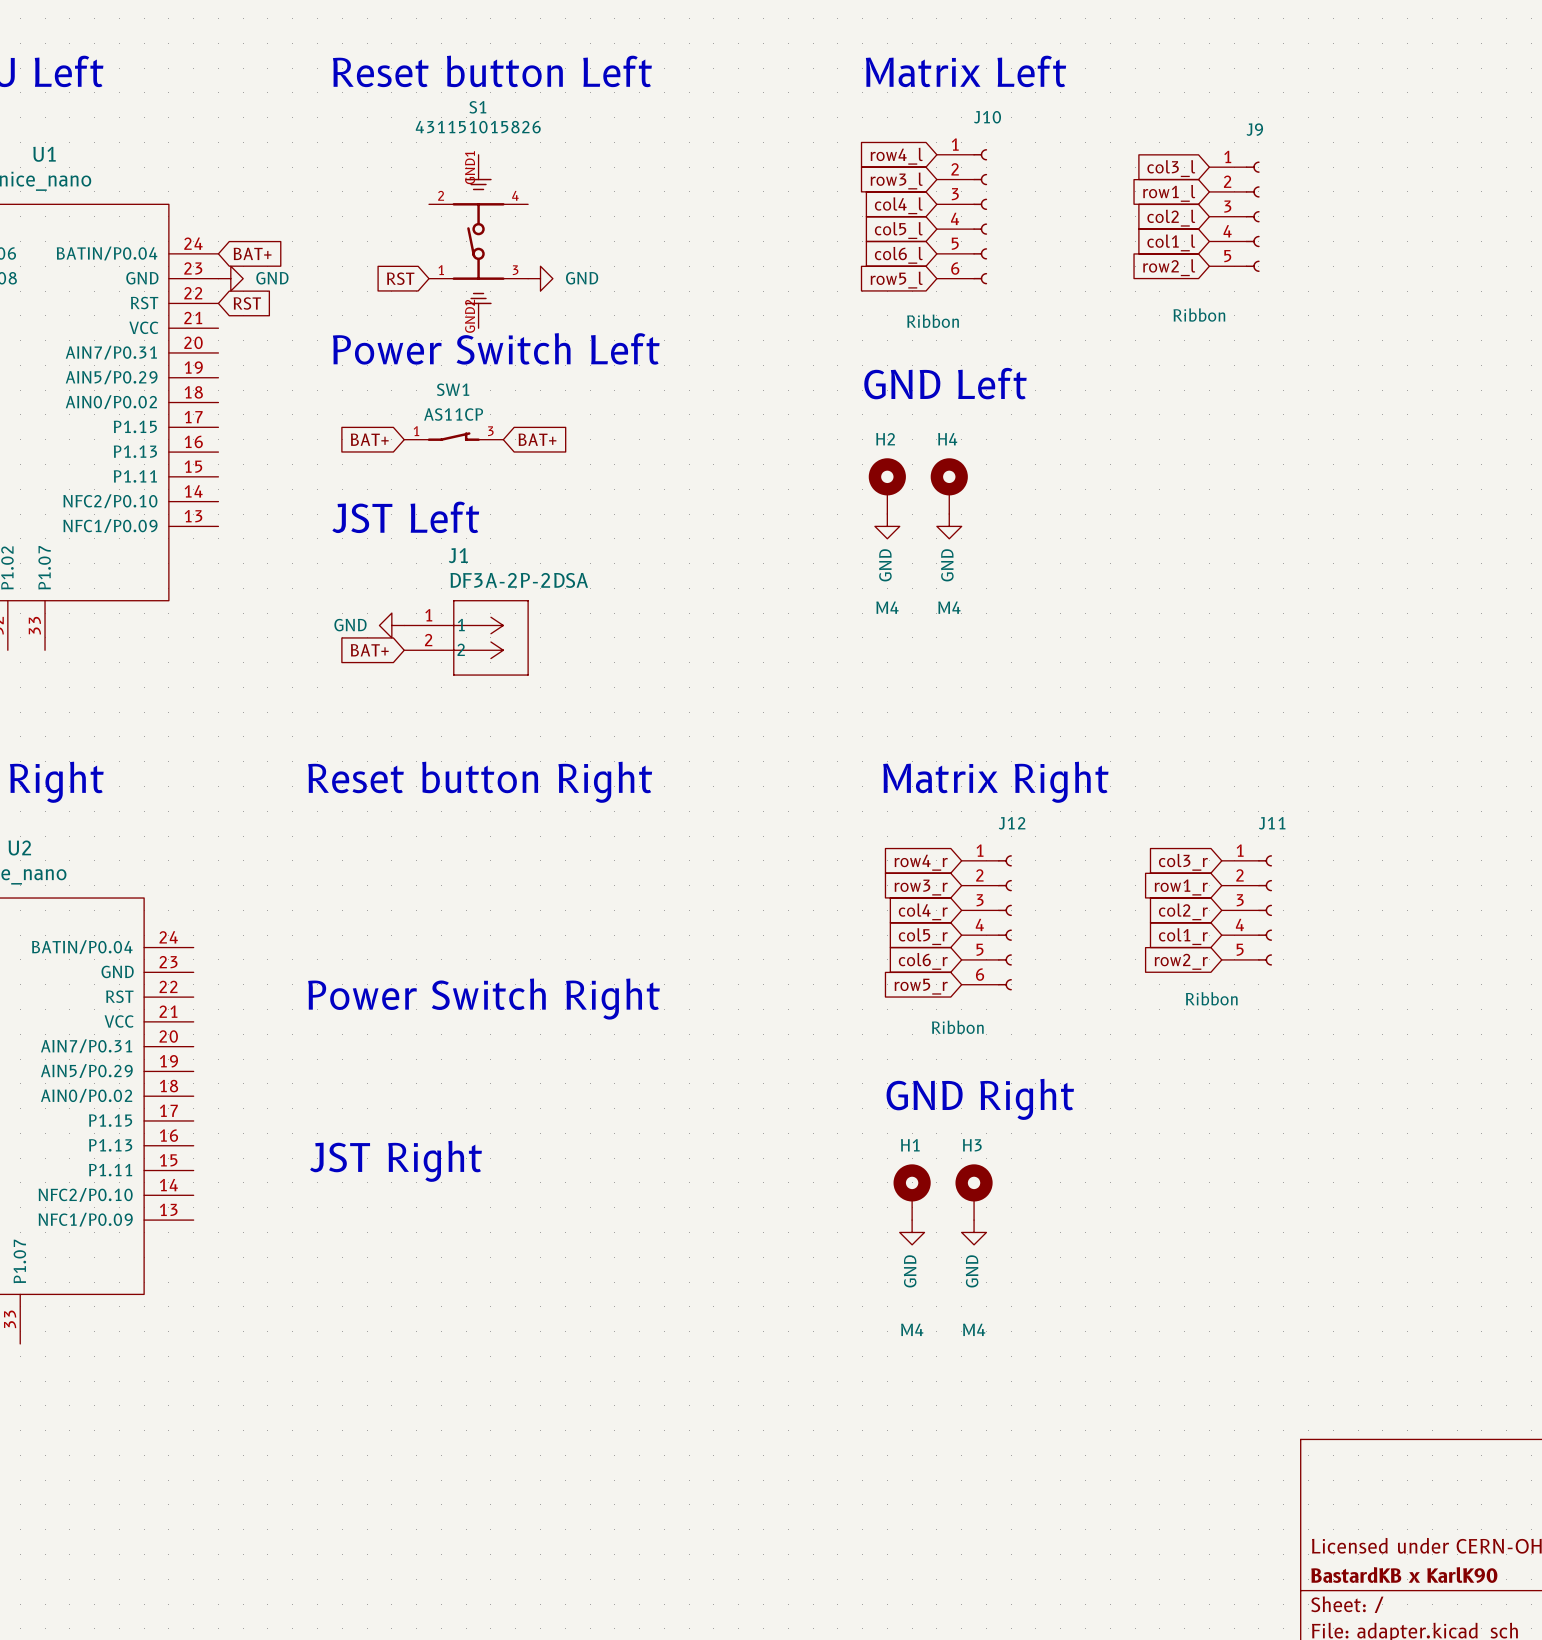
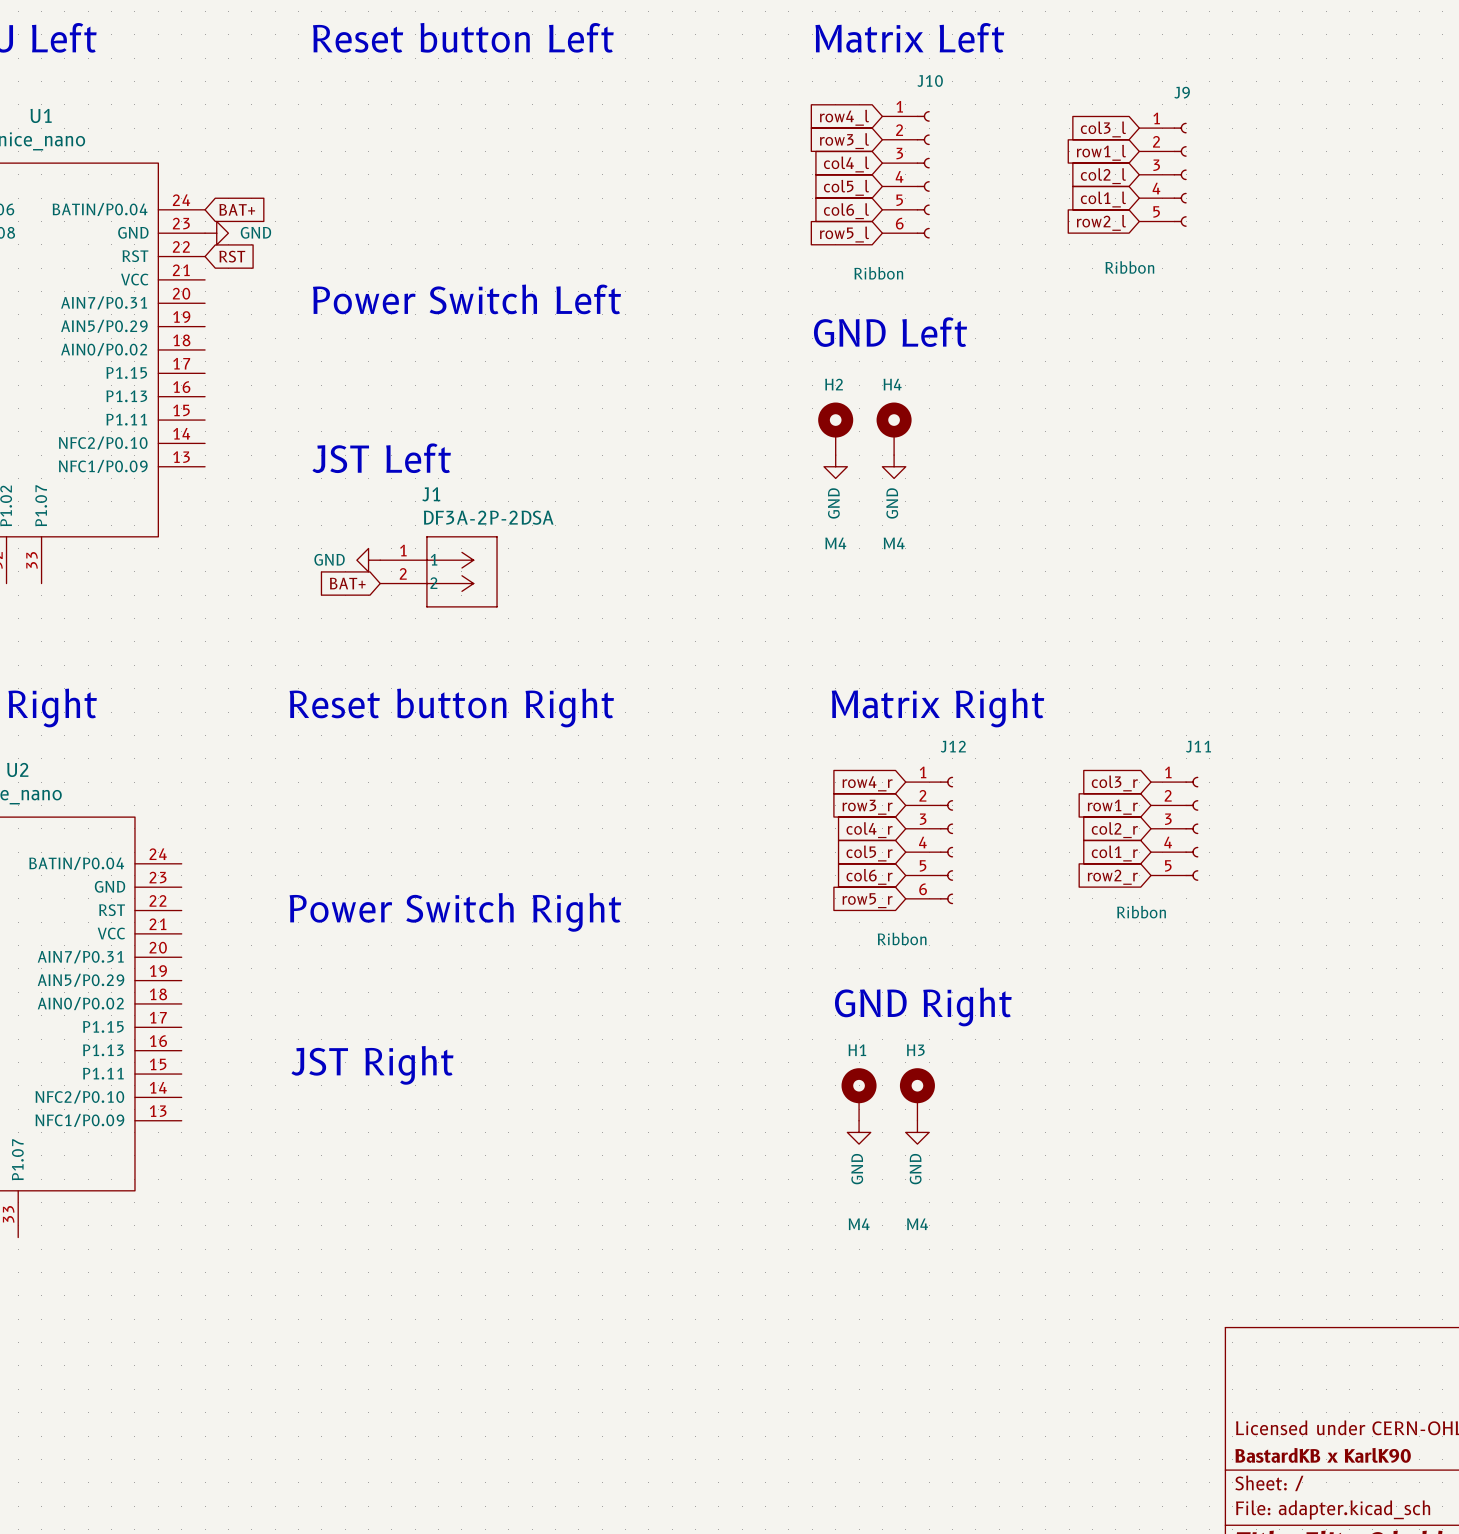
S1: 431151015826 (478, 241) -> none
global label: RST (400, 278) -> none
power symbol: GND (540, 278) -> none
SW1: AS11CP (453, 436) -> none
global label: BAT+ (369, 439) -> none
global label: BAT+ (537, 439) -> none

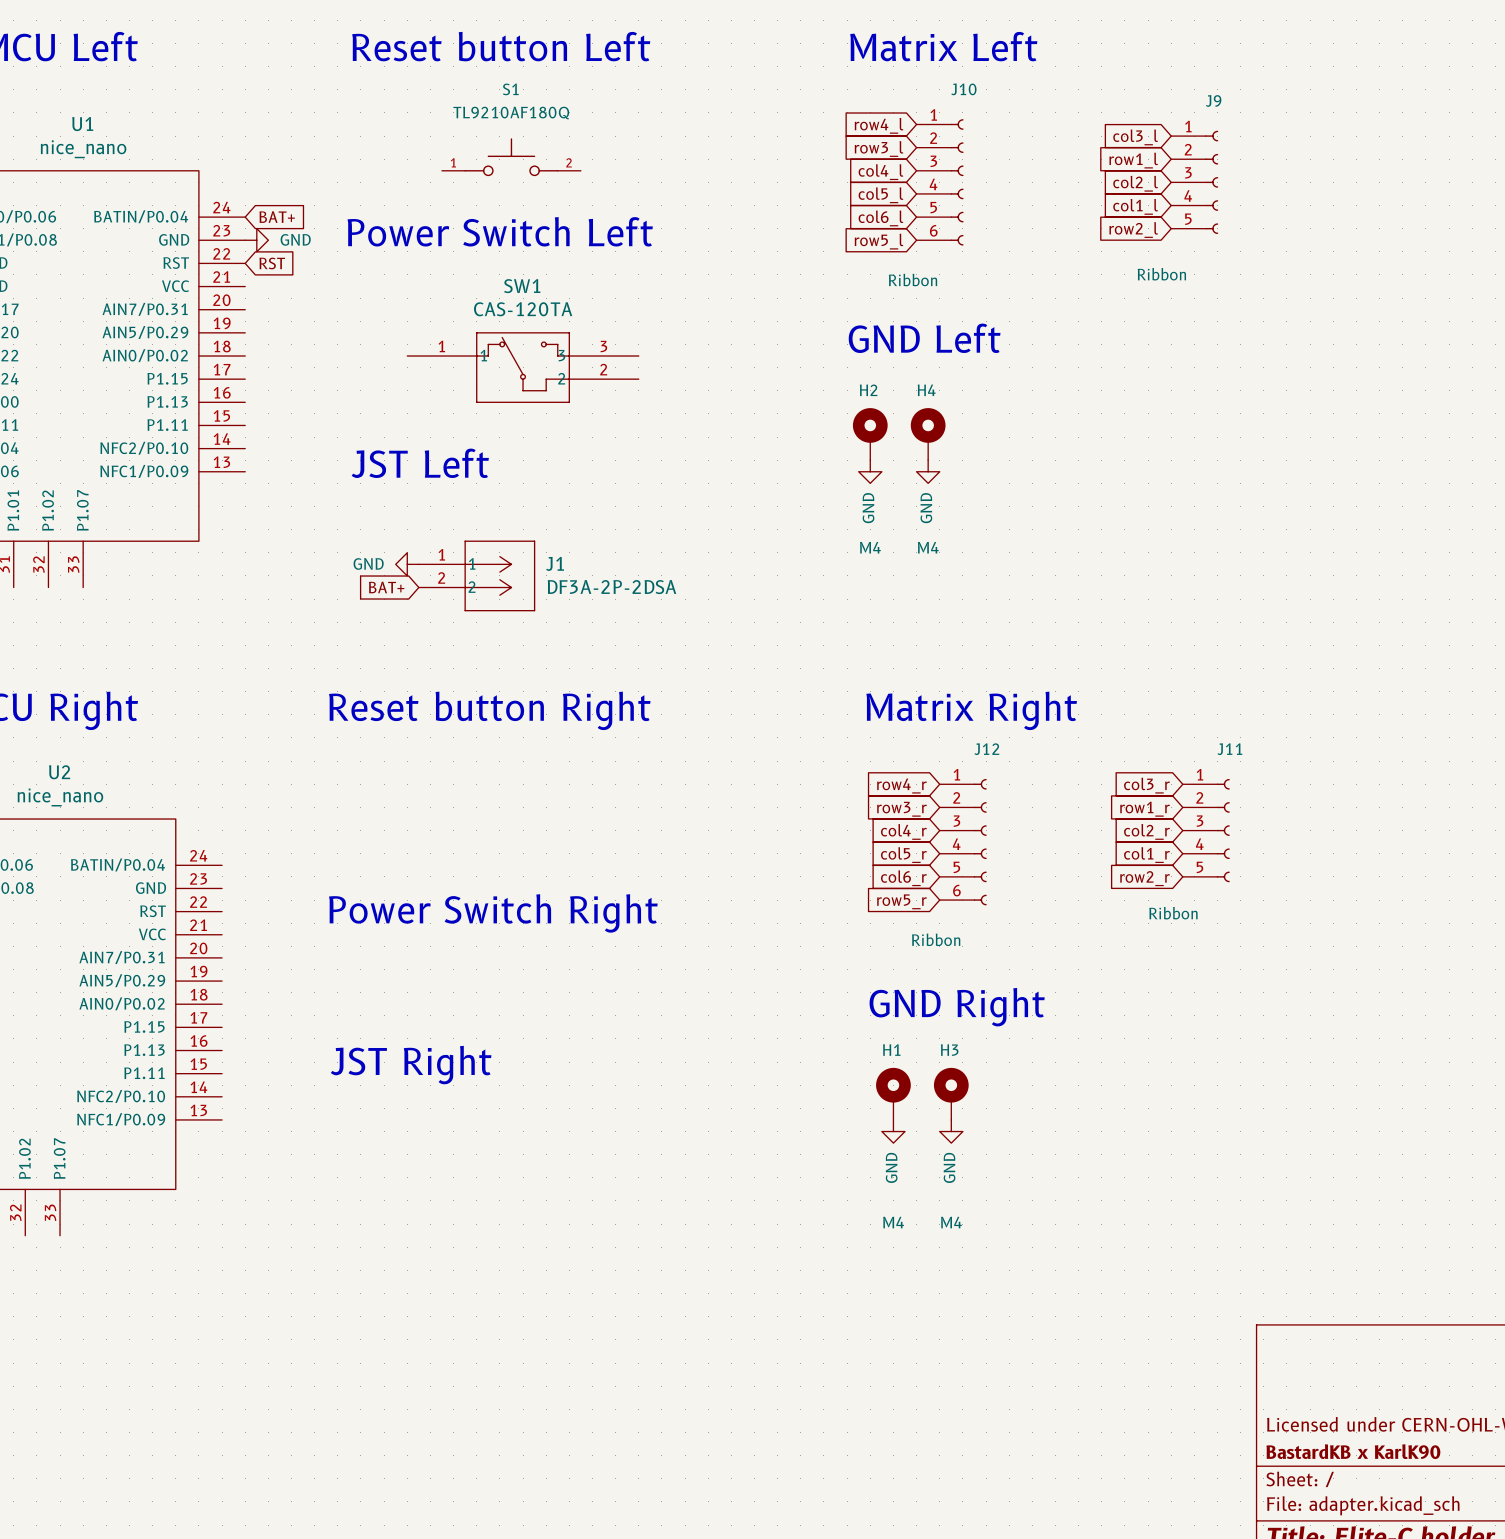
S1: none -> TL9210AF180Q (511, 157)
text position: Power Switch Left (466, 299) -> Power Switch Left (500, 231)
SW1: none -> CAS-120TA (523, 367)
J1 name position: J1 (431, 494) -> J1 (555, 563)
J1 value position: DF3A-2P-2DSA (488, 517) -> DF3A-2P-2DSA (611, 587)

